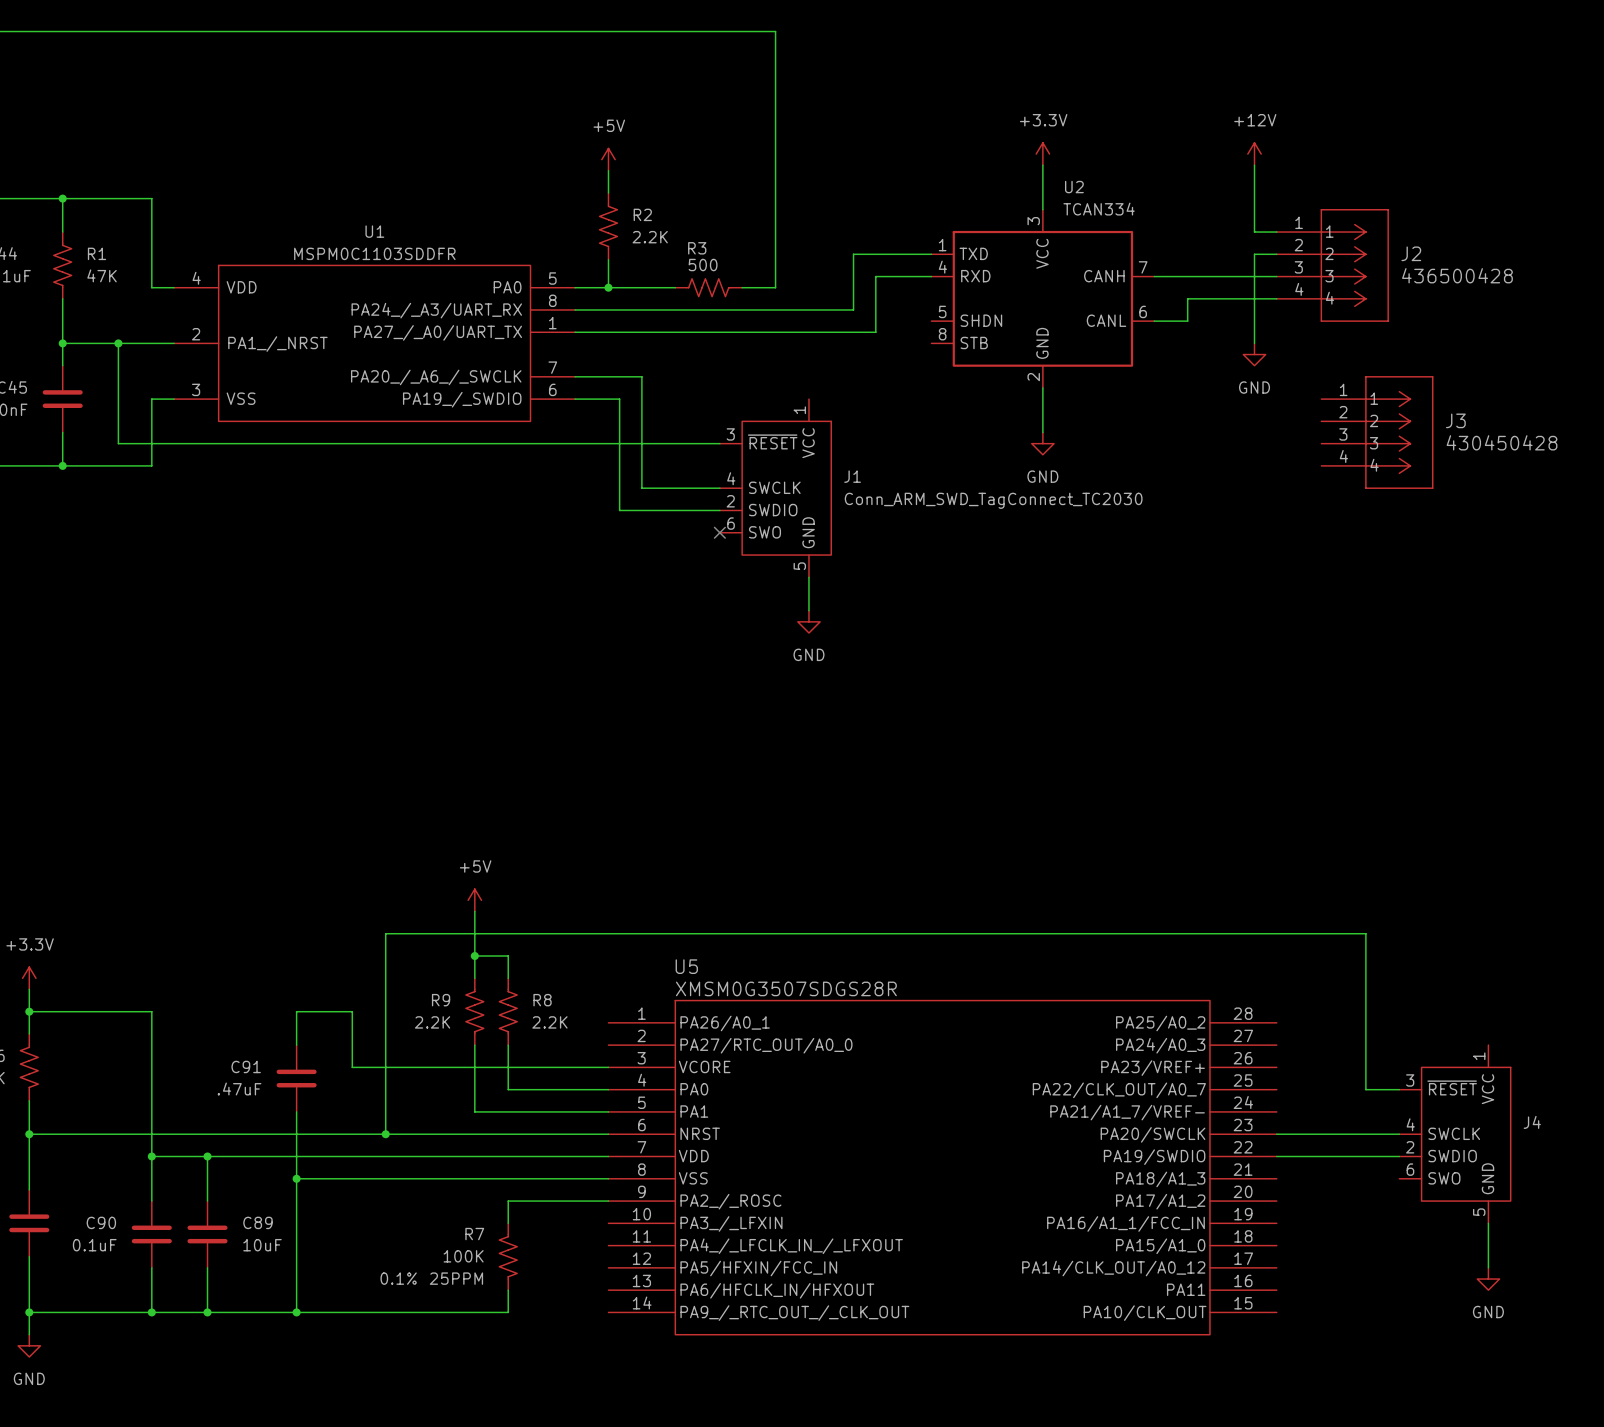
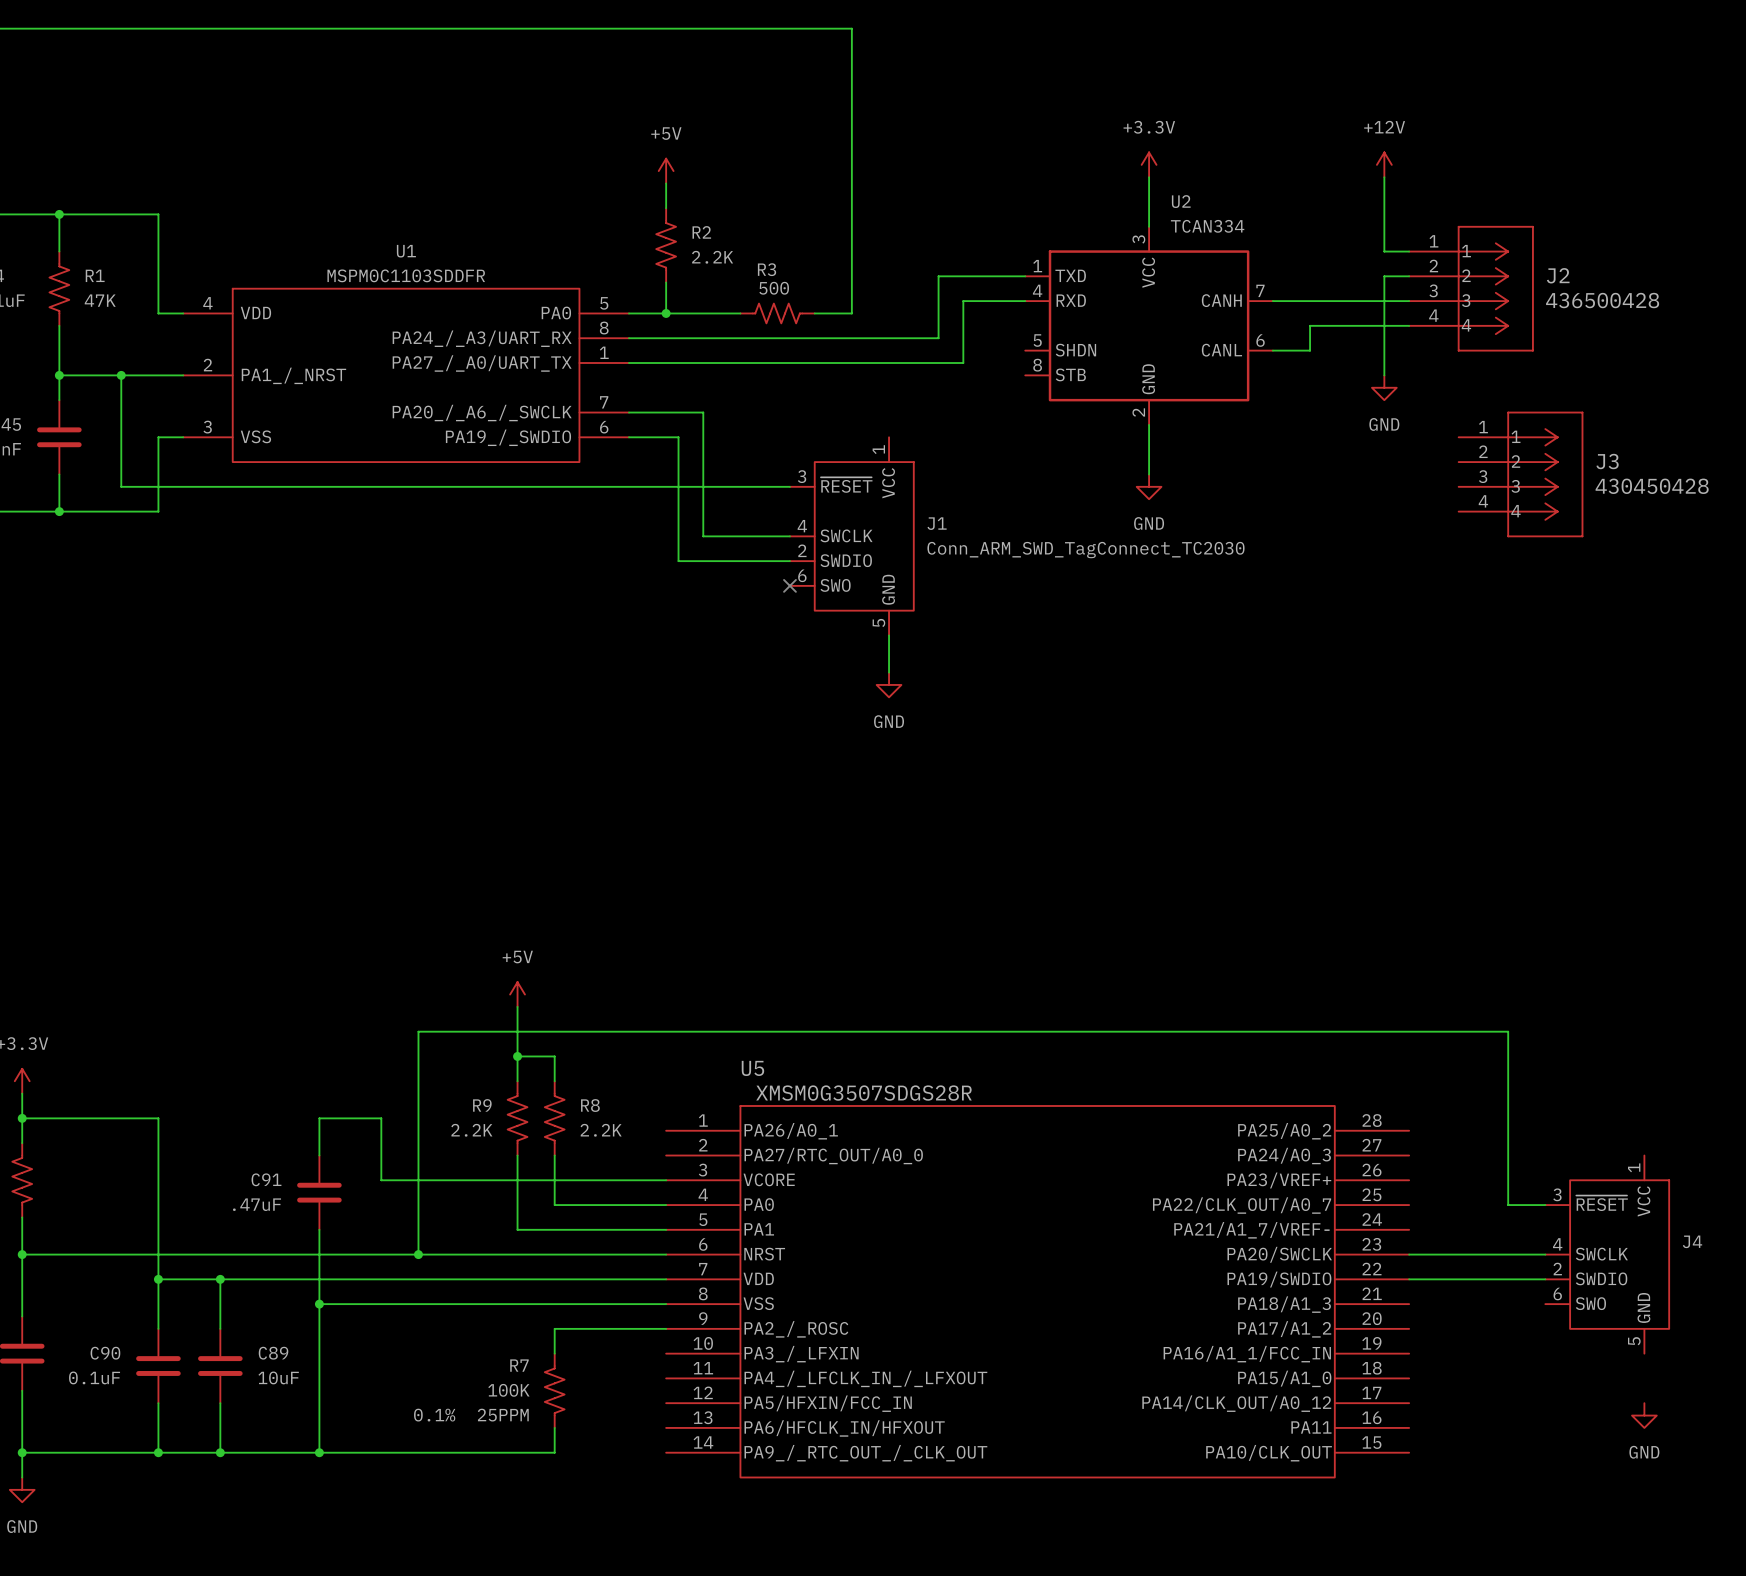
wire: (1488, 1223) (1488, 1267) -> none

